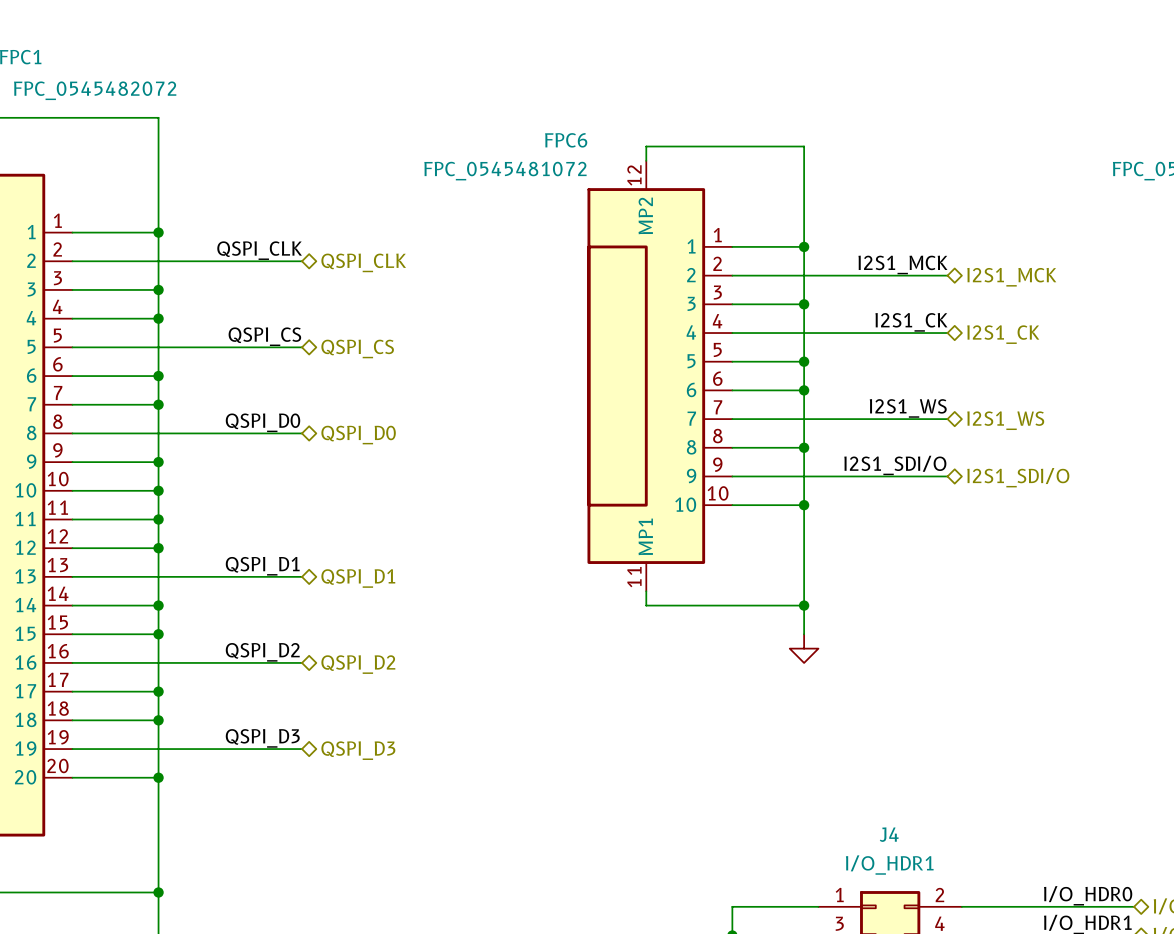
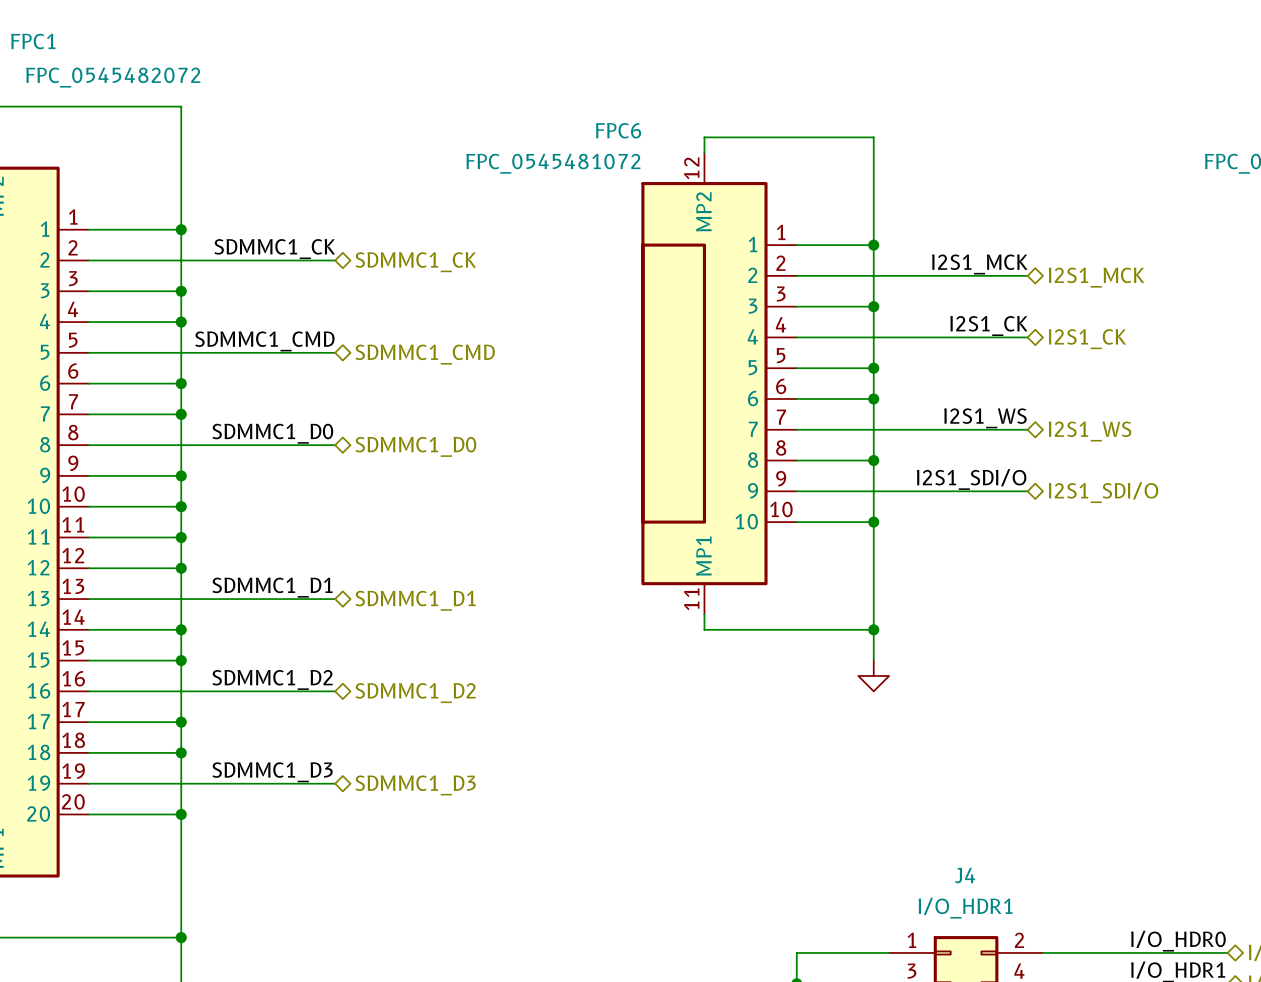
label: QSPI_CLK (259, 250) -> SDMMC1_CK (274, 249)
hierarchical label: QSPI_CLK (363, 262) -> SDMMC1_CK (415, 262)
label: QSPI_CS (264, 336) -> SDMMC1_CMD (264, 341)
hierarchical label: QSPI_CS (357, 348) -> SDMMC1_CMD (425, 354)
label: QSPI_D0 (262, 422) -> SDMMC1_D0 (272, 433)
hierarchical label: QSPI_D0 (358, 435) -> SDMMC1_D0 (415, 446)
label: QSPI_D1 (262, 566) -> SDMMC1_D1 (272, 587)
hierarchical label: QSPI_D1 (358, 578) -> SDMMC1_D1 (415, 600)
label: QSPI_D2 (262, 652) -> SDMMC1_D2 (272, 679)
hierarchical label: QSPI_D2 (358, 664) -> SDMMC1_D2 (415, 693)
label: QSPI_D3 (262, 738) -> SDMMC1_D3 (272, 772)
hierarchical label: QSPI_D3 (358, 750) -> SDMMC1_D3 (415, 785)

